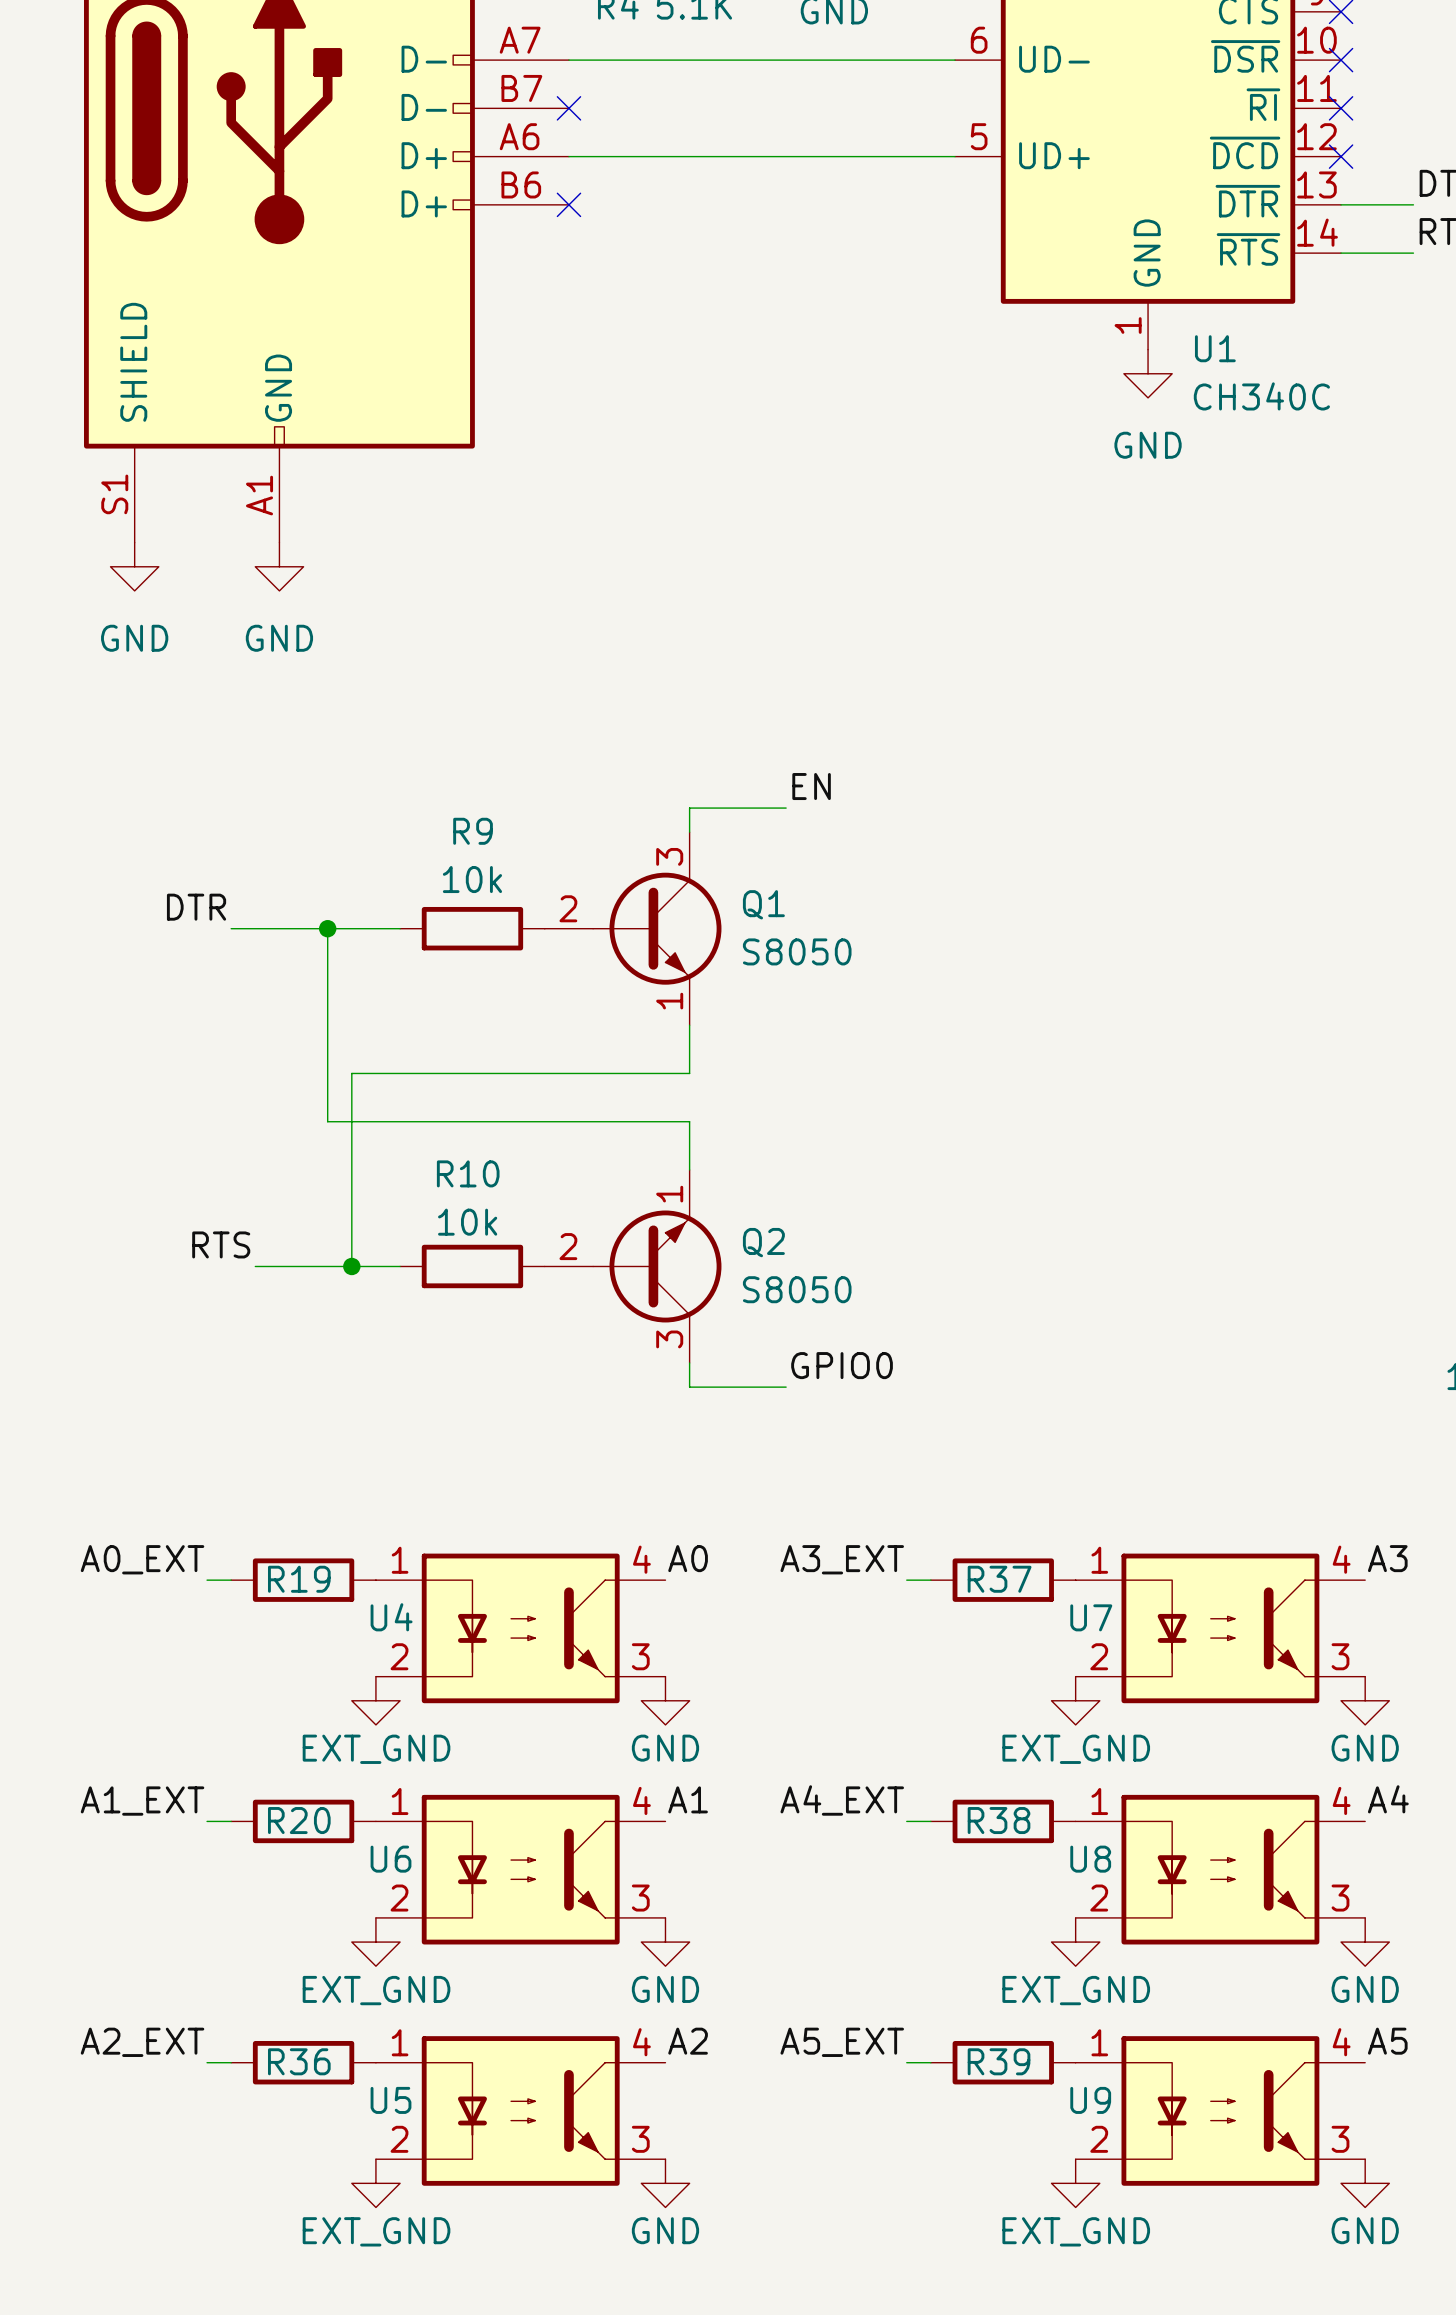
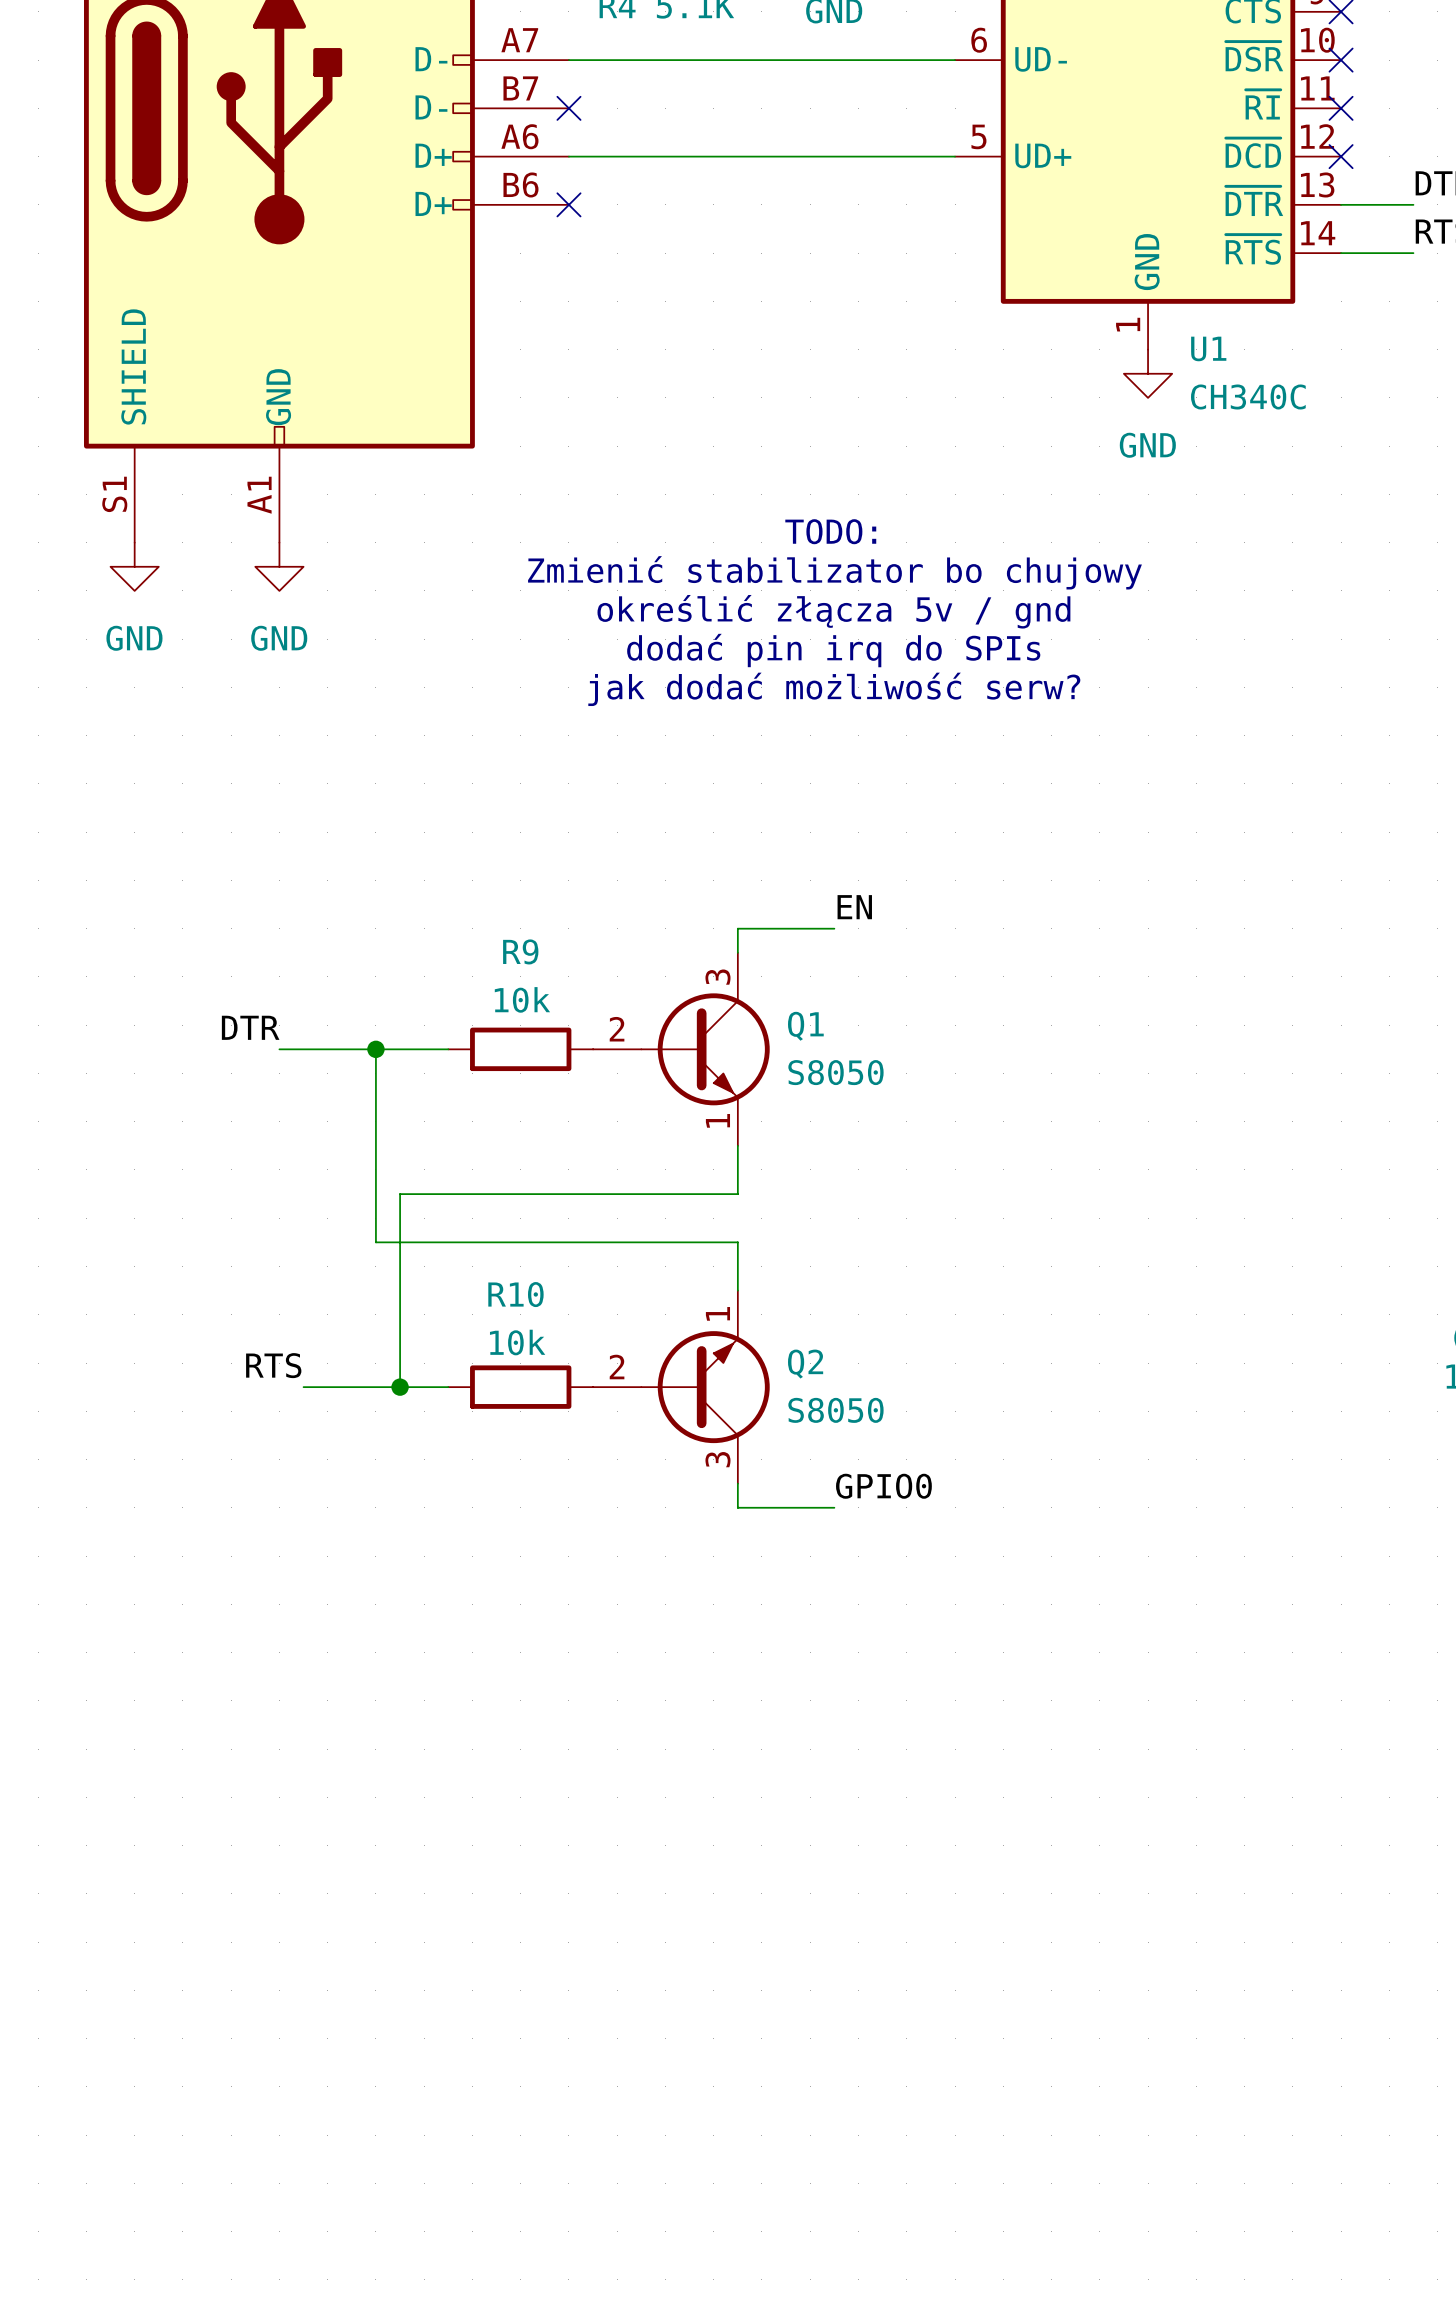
text: none -> TODO: (830, 531)
text: none -> Zmienić stabilizator bo chujowy (834, 572)
text: none -> określić złącza 5v / gnd (833, 611)
text: none -> dodać pin irq do SPIs (833, 650)
text: none -> jak dodać możliwość serw? (834, 689)
label position: EN (811, 786) -> EN (854, 907)
wire: (786, 808) (689, 808) (689, 832) -> (834, 928) (737, 928) (737, 952)
label position: DTR (196, 907) -> DTR (250, 1027)
wire: (231, 928) (400, 928) -> (279, 1049) (448, 1049)
wire: (327, 928) (327, 1121) (689, 1121) (689, 1169) -> (375, 1049) (375, 1242) (737, 1242) (737, 1290)
junction: (327, 928) -> none
R9 position: (472, 928) -> (520, 1049)
Q1 position: (633, 928) -> (681, 1049)
wire: (689, 1025) (689, 1073) (351, 1073) (351, 1266) -> (737, 1145) (737, 1194) (400, 1194) (400, 1387)
junction: none -> (375, 1049)
label position: RTS (221, 1244) -> RTS (273, 1365)
wire: (255, 1266) (400, 1266) -> (303, 1387) (448, 1387)
junction: (351, 1266) -> none
R10 position: (472, 1266) -> (520, 1387)
Q2 position: (633, 1266) -> (681, 1387)
wire: (689, 1363) (689, 1387) (786, 1387) -> (737, 1483) (737, 1507) (834, 1507)
label position: GPIO0 (842, 1365) -> GPIO0 (883, 1486)
junction: none -> (400, 1387)
label: A0 (688, 1558) -> none
label: A3 (1387, 1558) -> none
label: A0_EXT (142, 1559) -> none
label: A3_EXT (842, 1559) -> none
wire: (207, 1580) (231, 1580) -> none
R19: (303, 1580) -> none
wire: (906, 1580) (930, 1580) -> none
R37: (1003, 1580) -> none
U4: (520, 1628) -> none
U7: (1220, 1628) -> none
power symbol: EXT_GND (375, 1700) -> none
power symbol: GND (665, 1700) -> none
power symbol: EXT_GND (1075, 1700) -> none
power symbol: GND (1365, 1700) -> none
label: A1 (688, 1799) -> none
label: A4 (1388, 1799) -> none
label: A4_EXT (842, 1800) -> none
label: A1_EXT (142, 1801) -> none
wire: (207, 1821) (231, 1821) -> none
R20: (303, 1821) -> none
wire: (906, 1821) (930, 1821) -> none
R38: (1003, 1821) -> none
U6: (520, 1869) -> none
U8: (1220, 1869) -> none
power symbol: EXT_GND (375, 1942) -> none
power symbol: GND (665, 1942) -> none
power symbol: EXT_GND (1075, 1942) -> none
power symbol: GND (1365, 1942) -> none
label: A2 (688, 2041) -> none
label: A5 (1387, 2041) -> none
label: A2_EXT (142, 2042) -> none
label: A5_EXT (842, 2042) -> none
wire: (207, 2062) (231, 2062) -> none
R36: (303, 2062) -> none
wire: (906, 2062) (930, 2062) -> none
R39: (1003, 2062) -> none
U5: (520, 2110) -> none
U9: (1220, 2110) -> none
power symbol: EXT_GND (375, 2183) -> none
power symbol: GND (665, 2183) -> none
power symbol: EXT_GND (1075, 2183) -> none
power symbol: GND (1365, 2183) -> none

